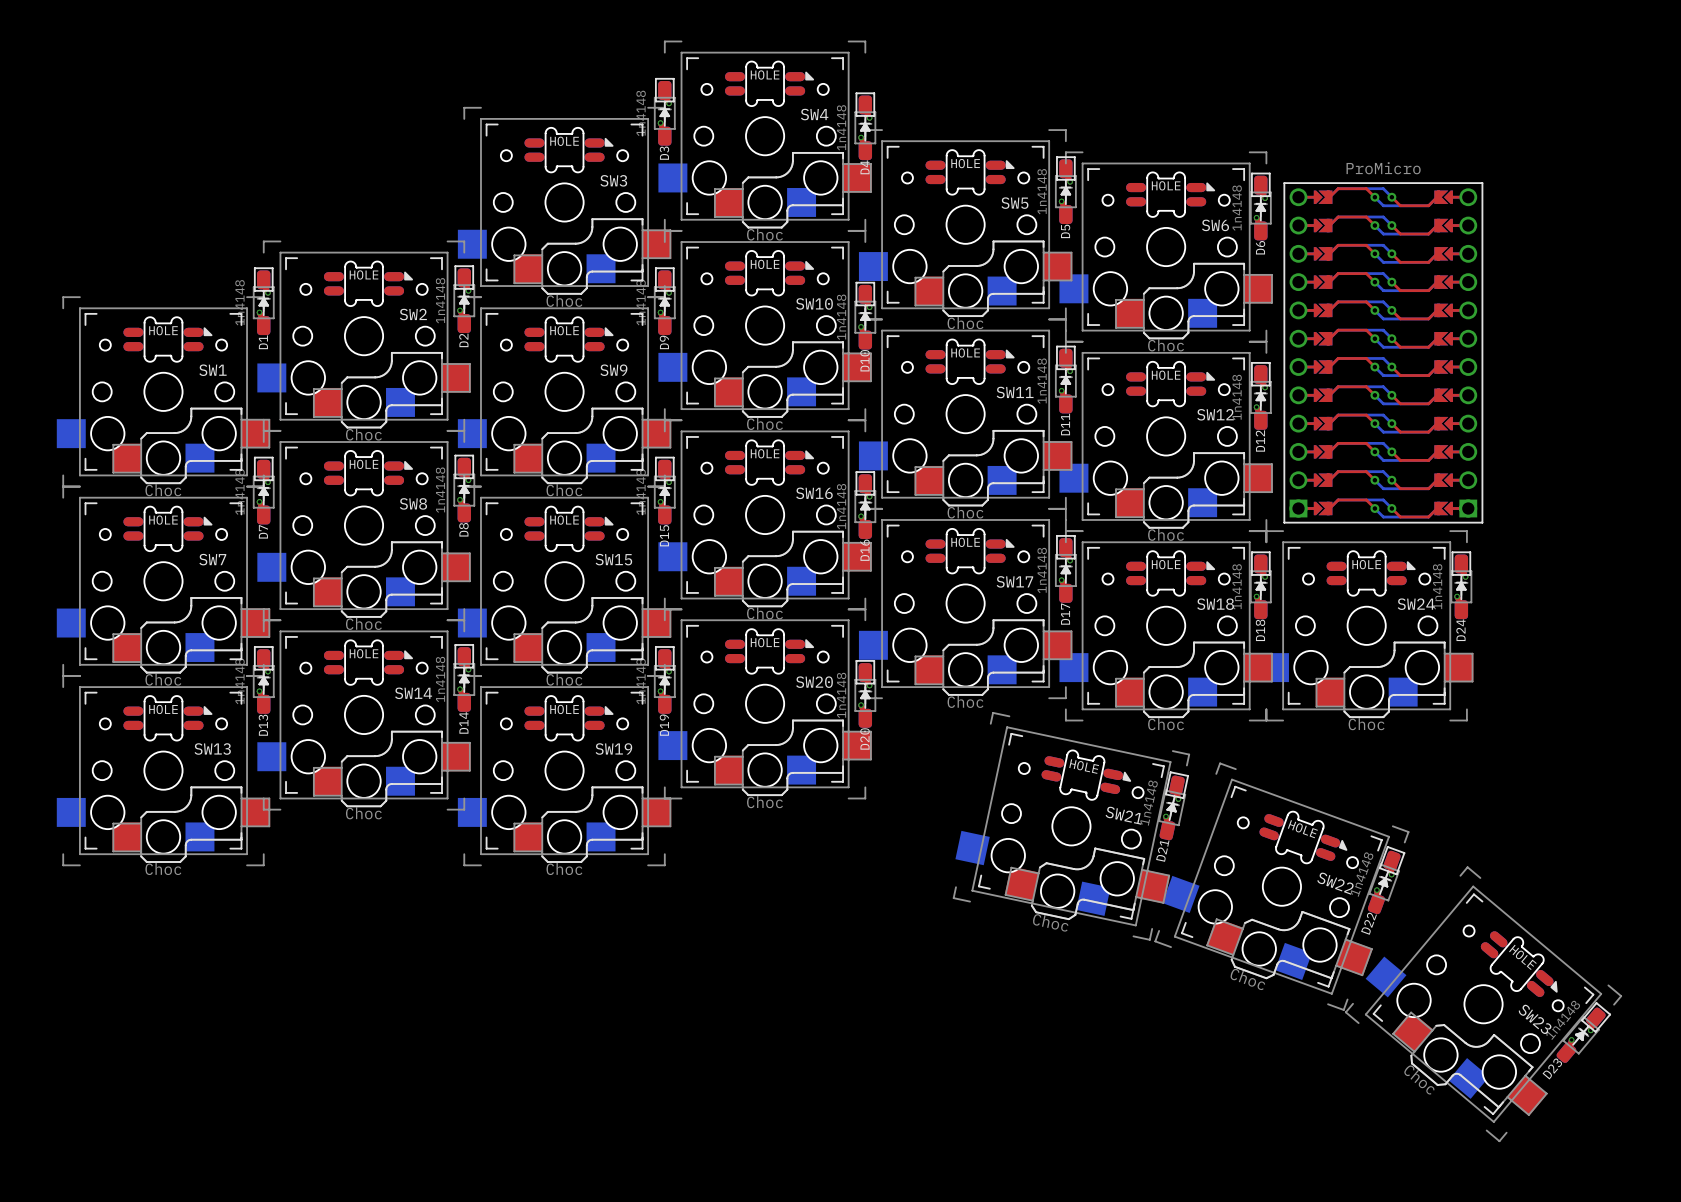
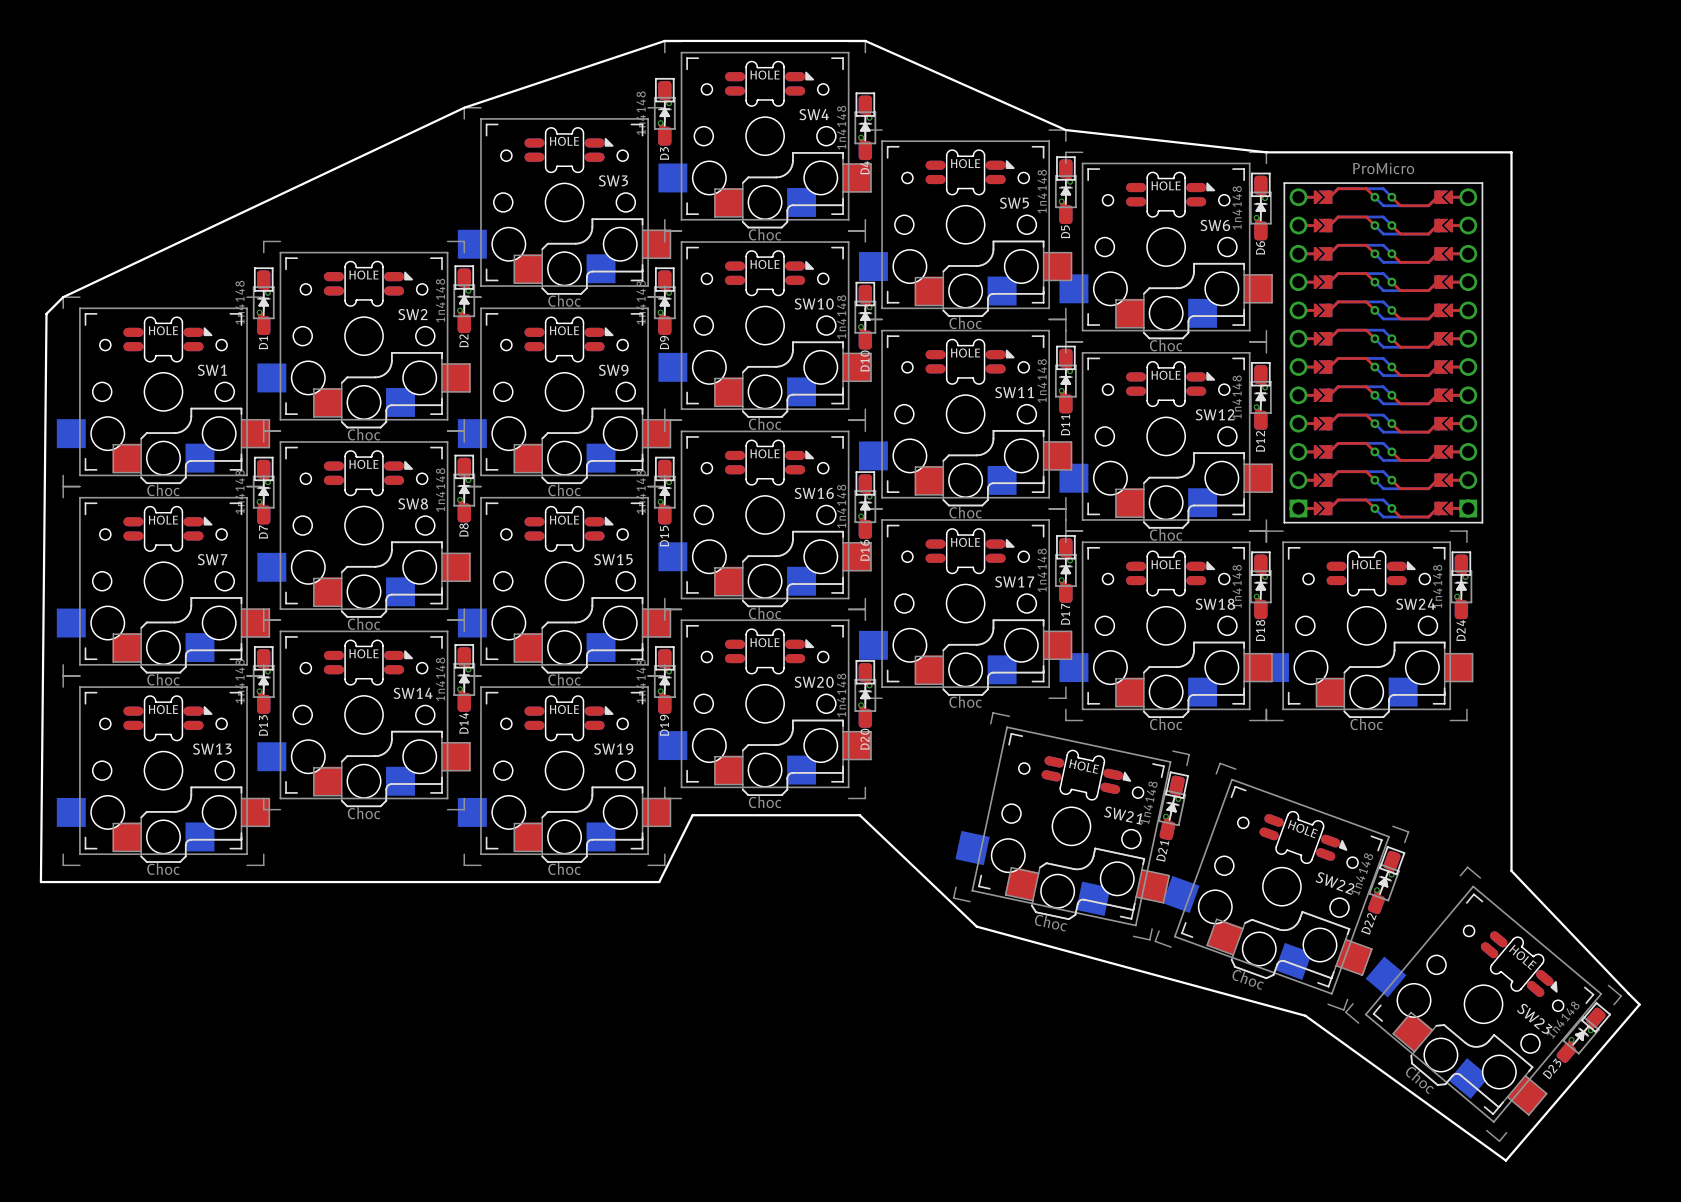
board edge: none -> (664, 40) (464, 107) (63, 297) (46, 313) (40, 882) (659, 882) (692, 815) (859, 815) (976, 926) (1305, 1015) (1505, 1160) (1639, 1004) (1511, 870) (1511, 152) (1266, 152) (1065, 130) (865, 40) (664, 40)

